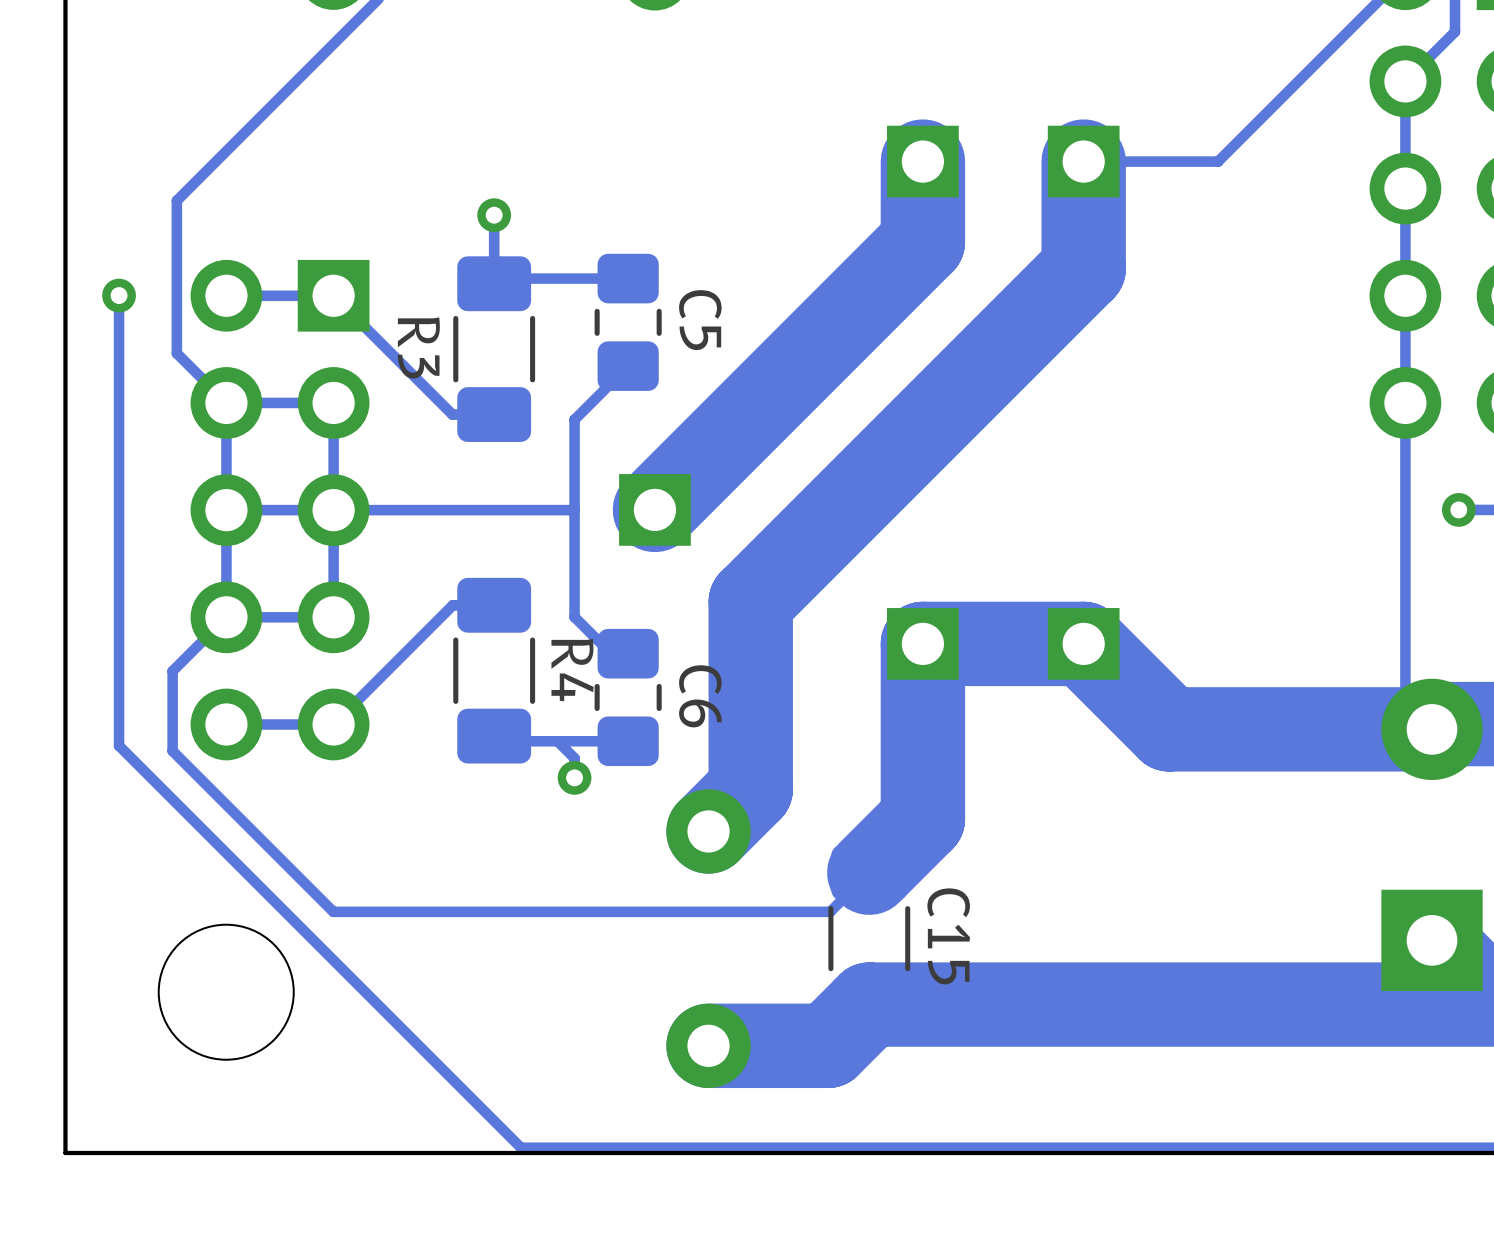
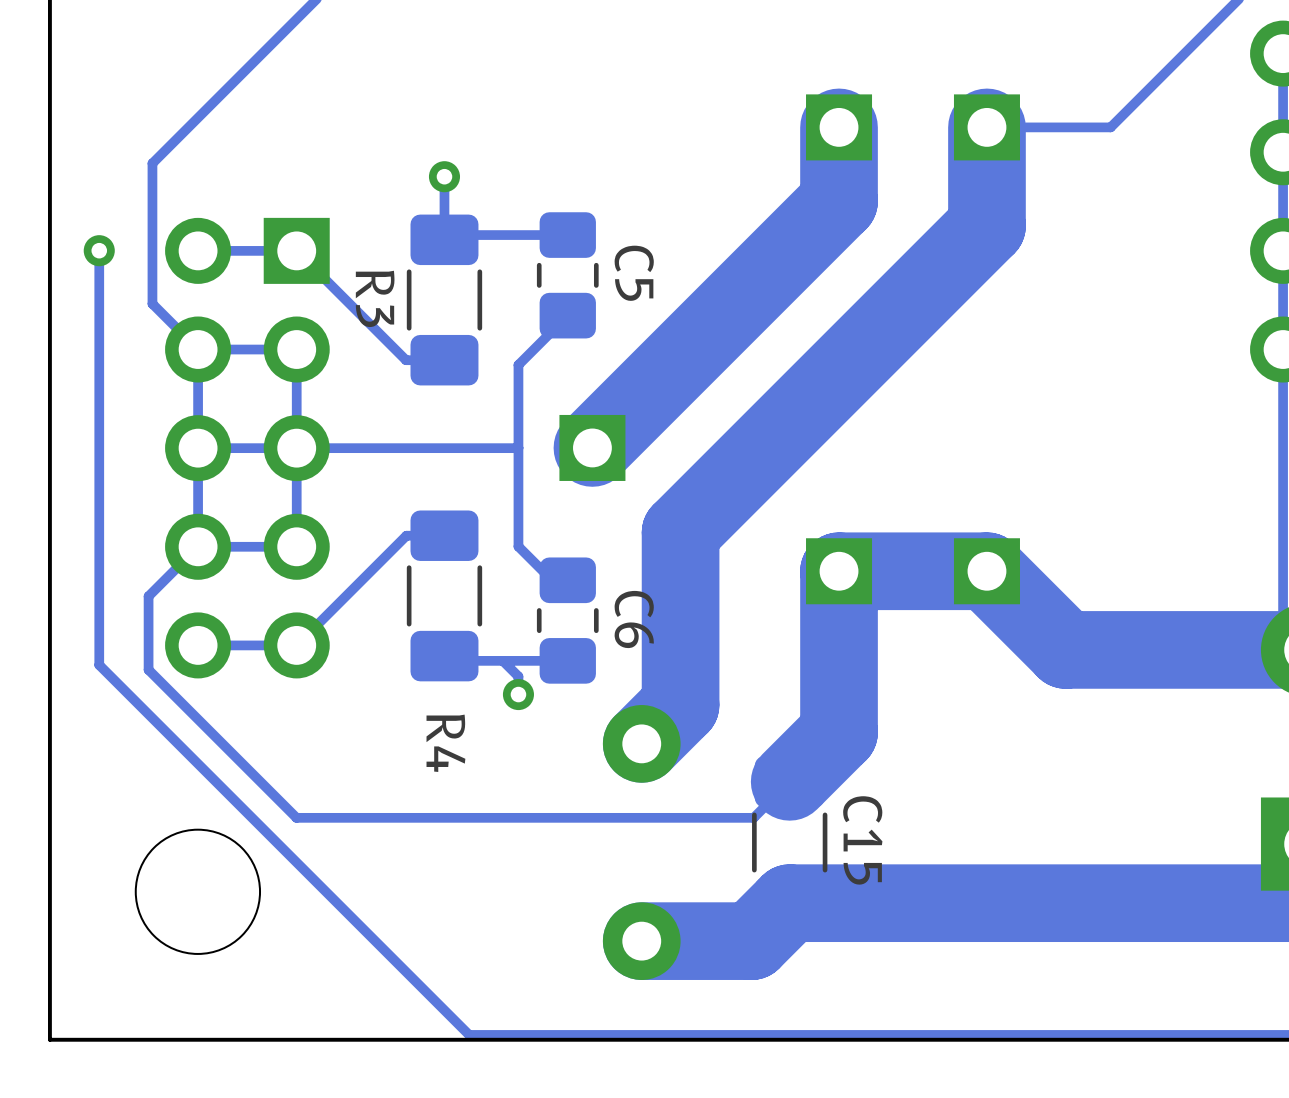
R4 name position: R4 (572, 670) -> R4 (445, 743)

